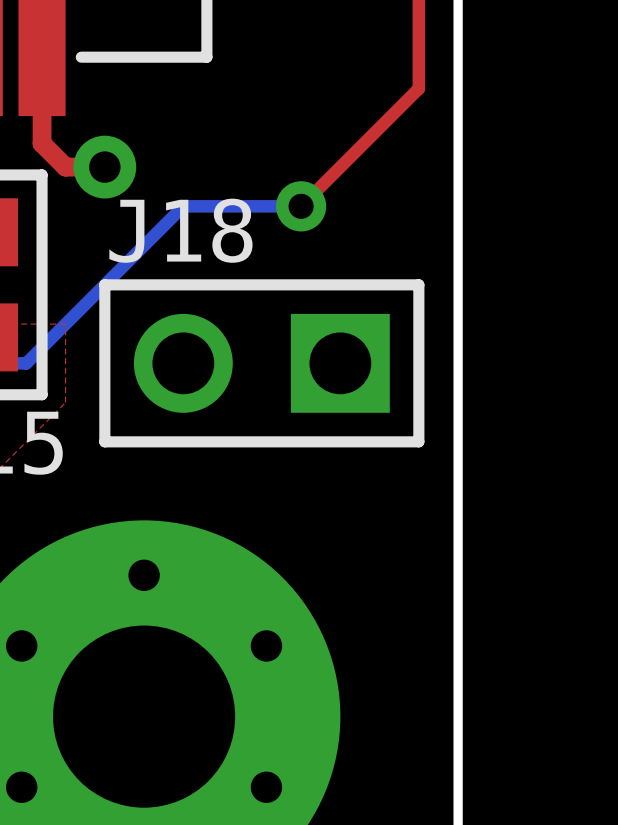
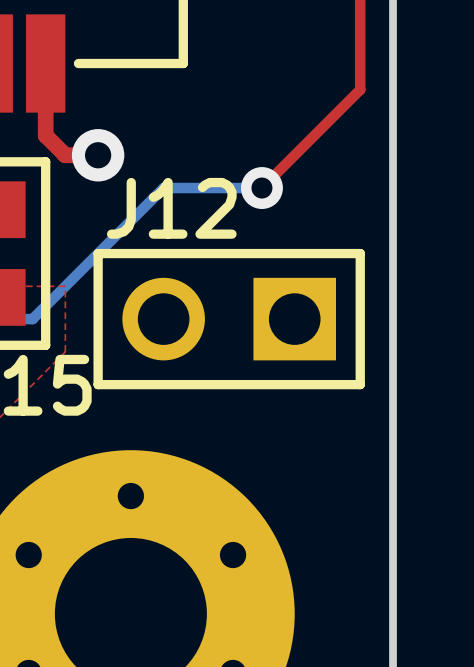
J18 name: J18 (180, 230) -> J12 (171, 208)

